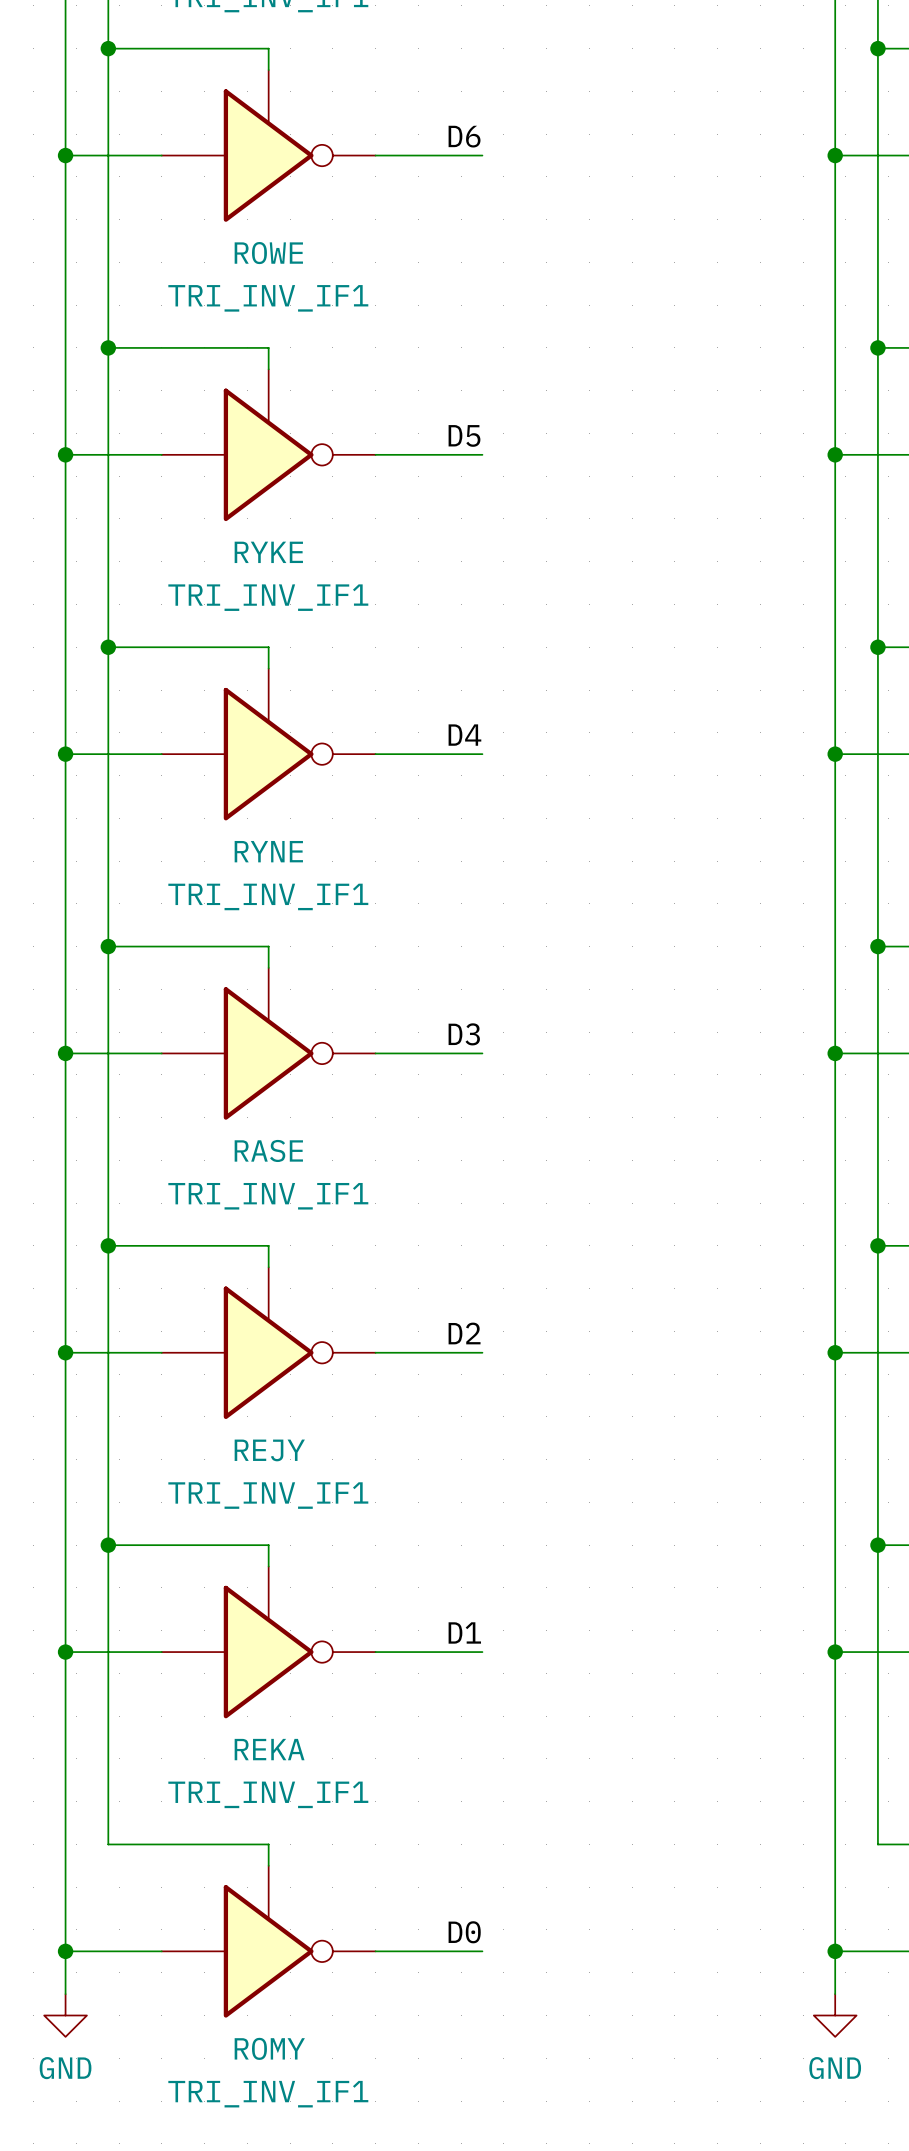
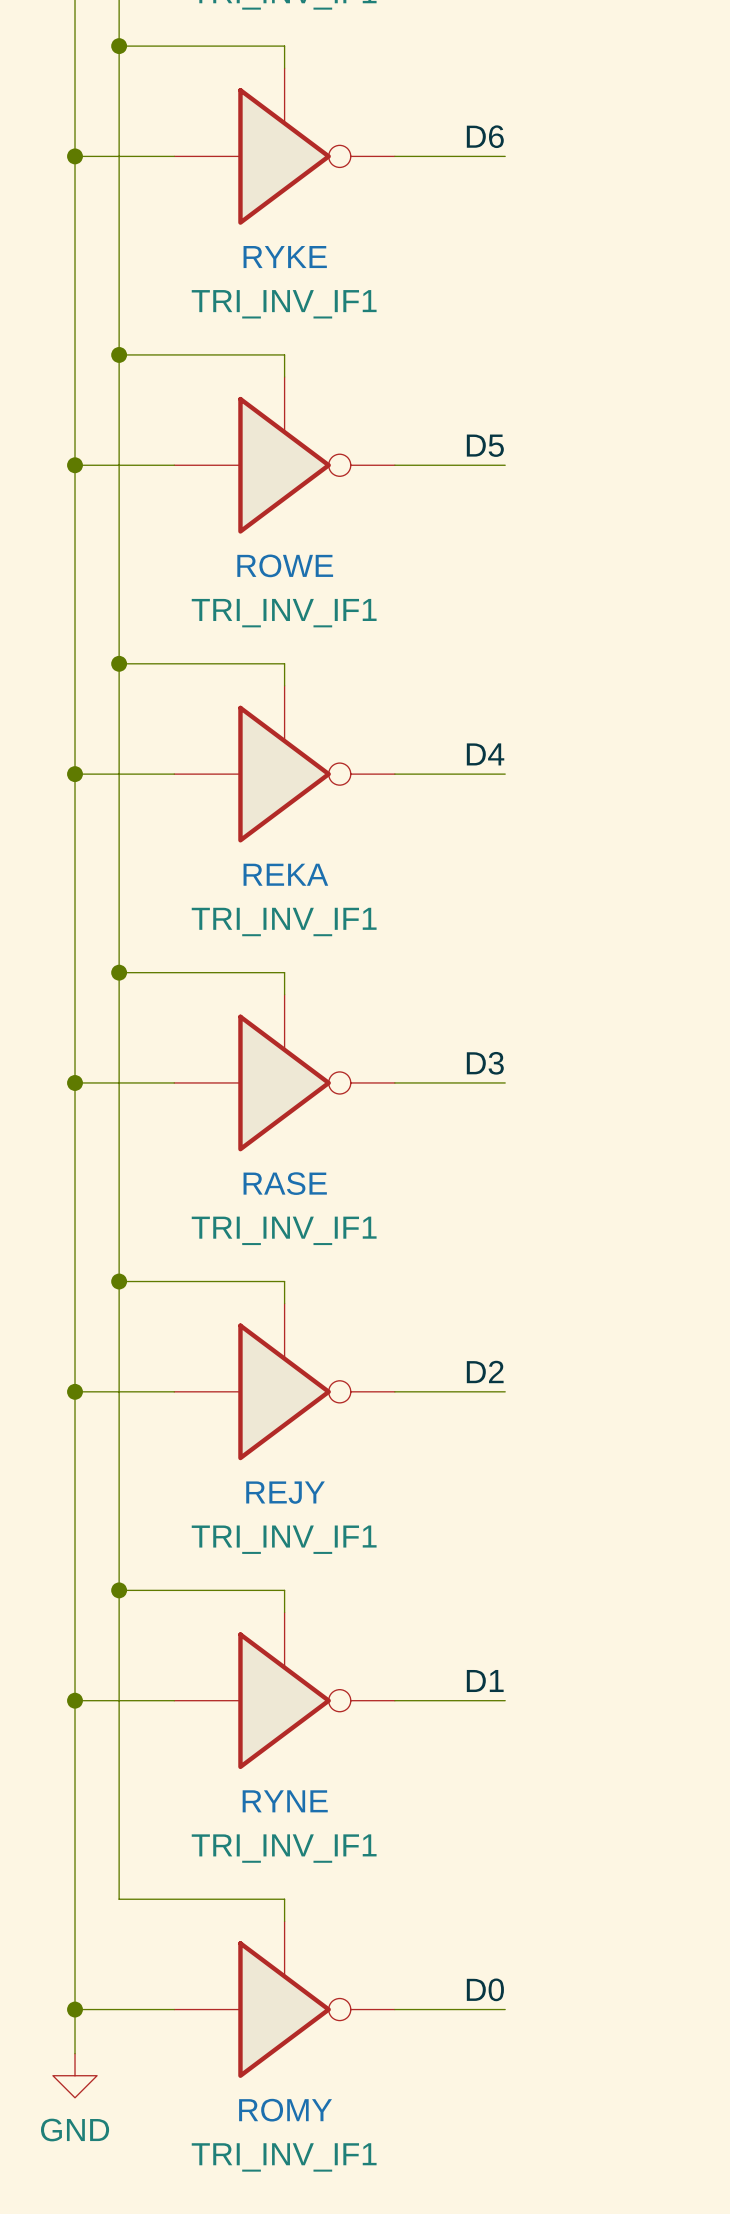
ROWE name: ROWE (268, 253) -> RYKE (285, 257)
RYKE name: RYKE (268, 552) -> ROWE (285, 565)
RYNE name: RYNE (268, 851) -> REKA (285, 874)
REKA name: REKA (269, 1749) -> RYNE (285, 1801)

